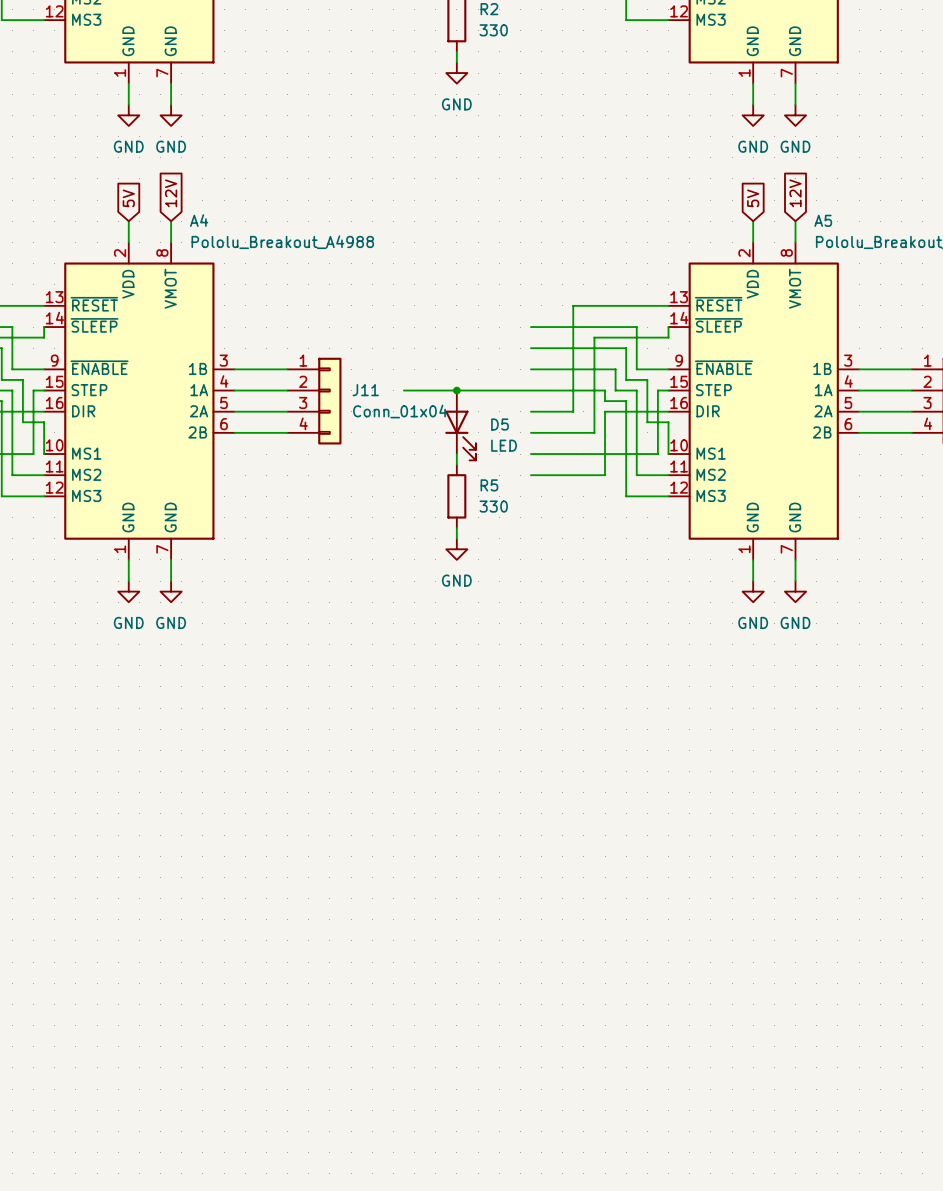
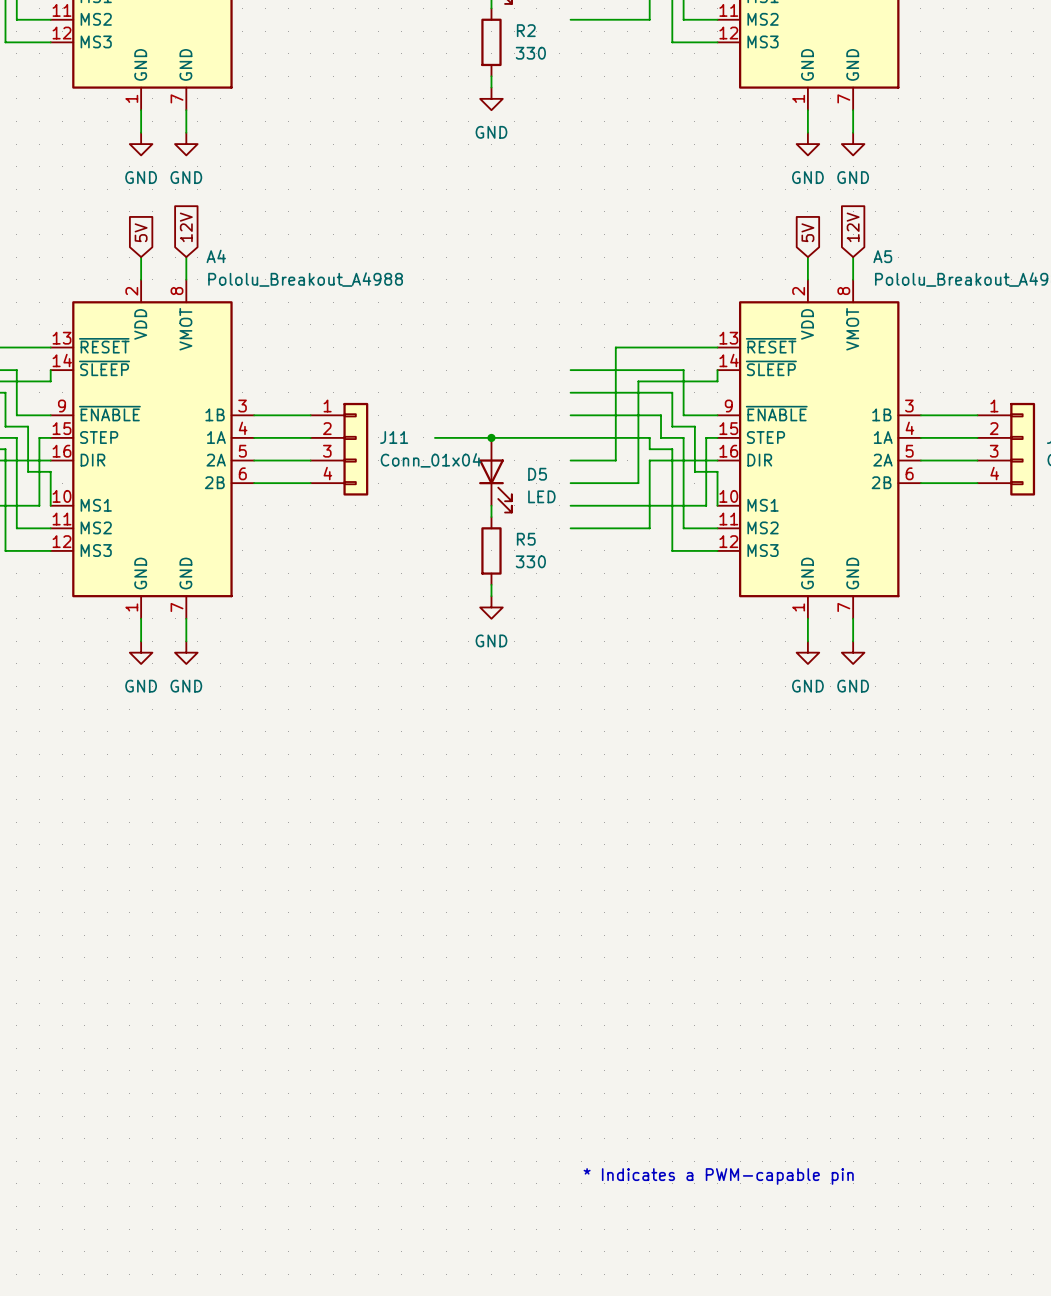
text: none -> * Indicates a PWM-capable pin (718, 1176)

